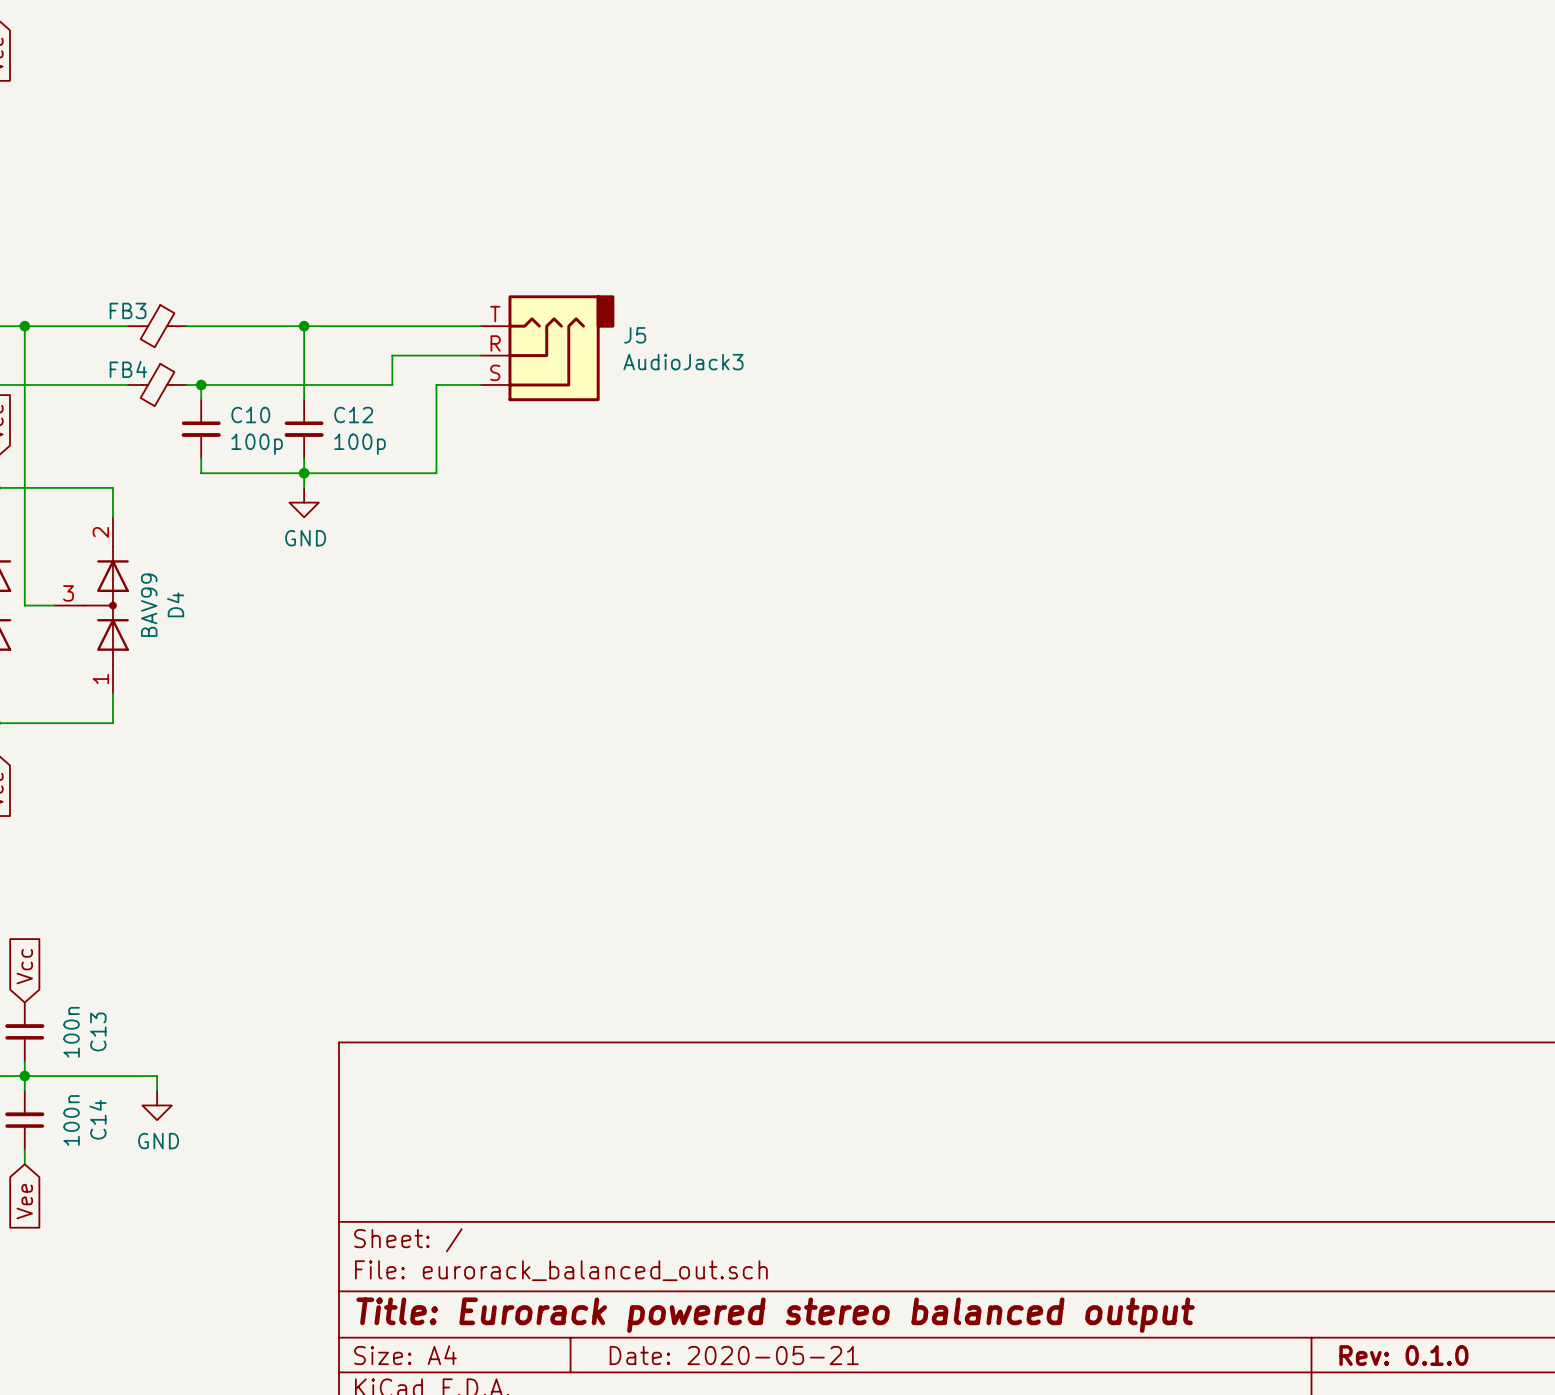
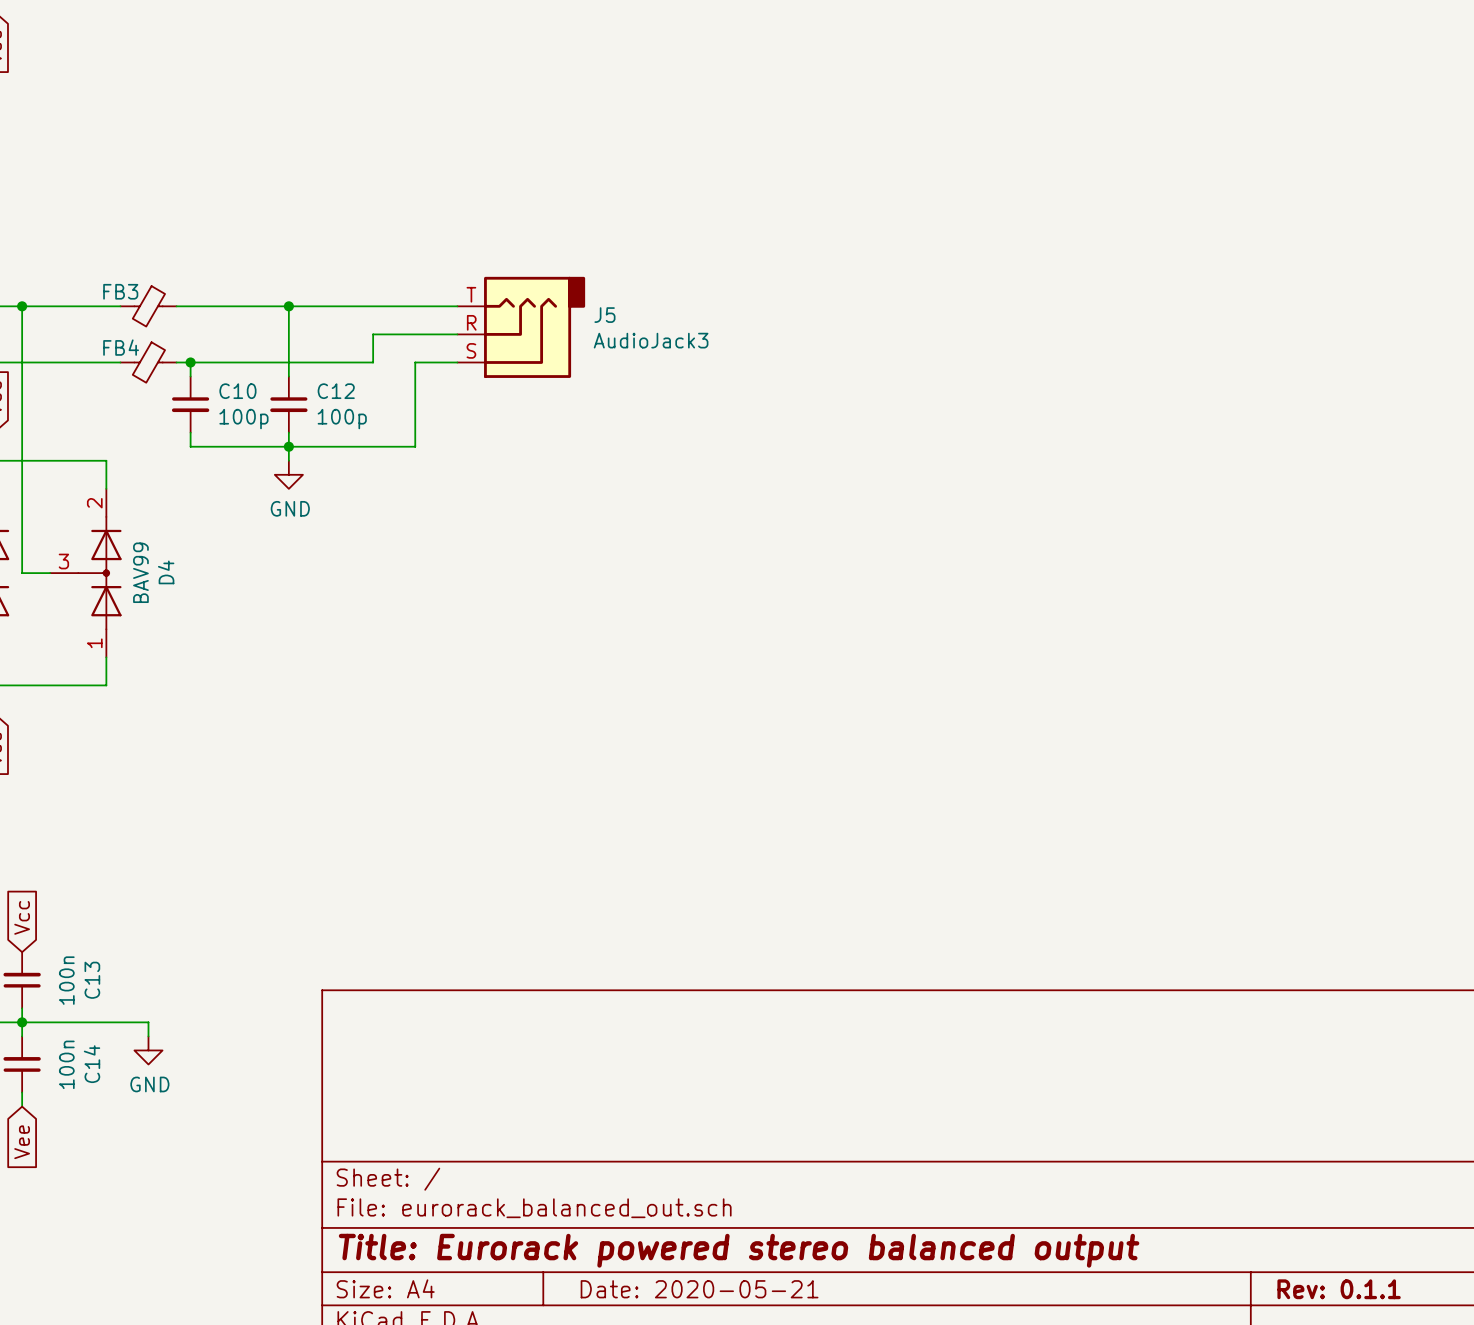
title block: Rev: 0.1.0 (1403, 1355) -> Rev: 0.1.1 (1339, 1289)

